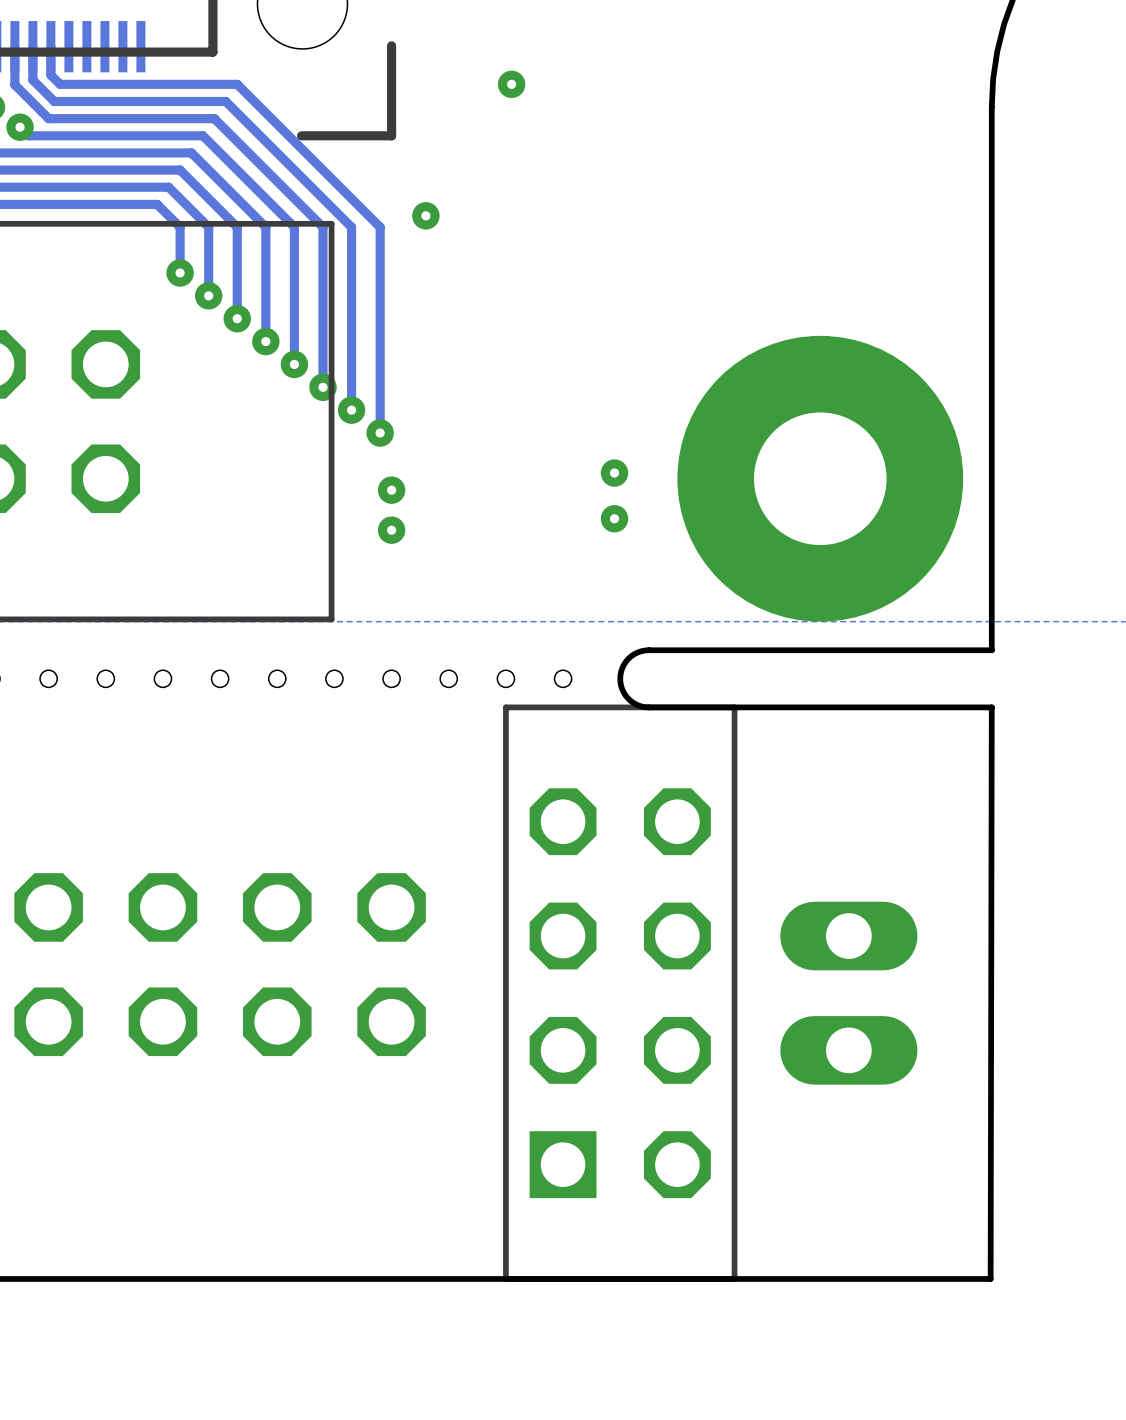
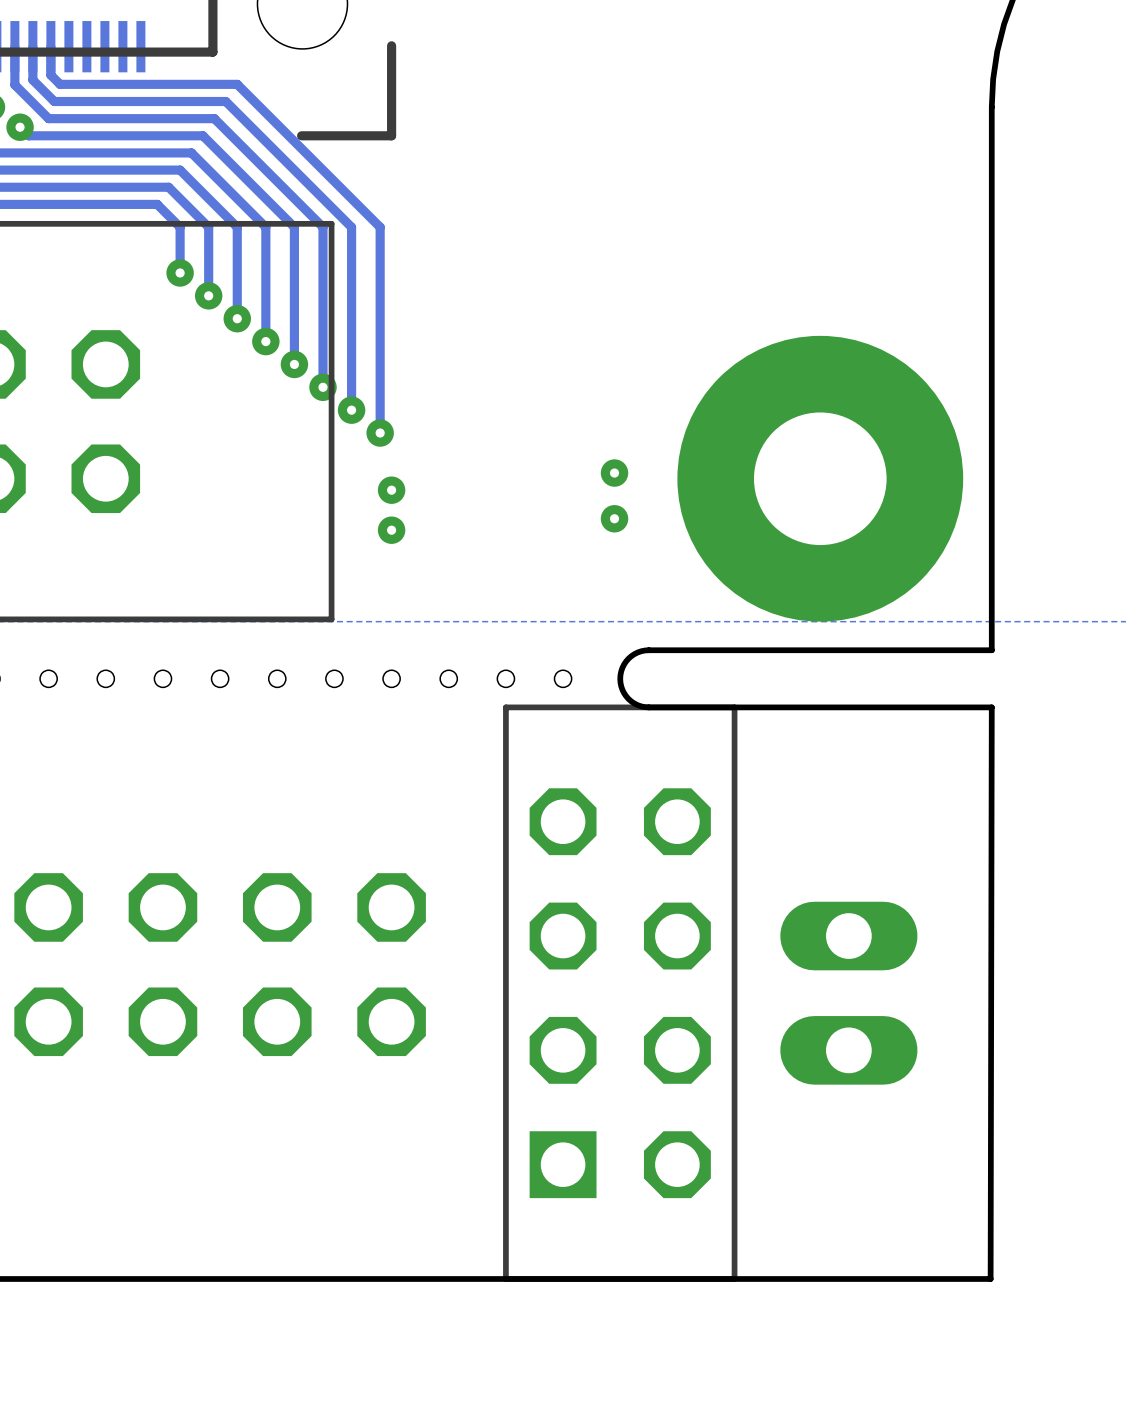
via: (511, 84) -> none
via: (425, 215) -> none

